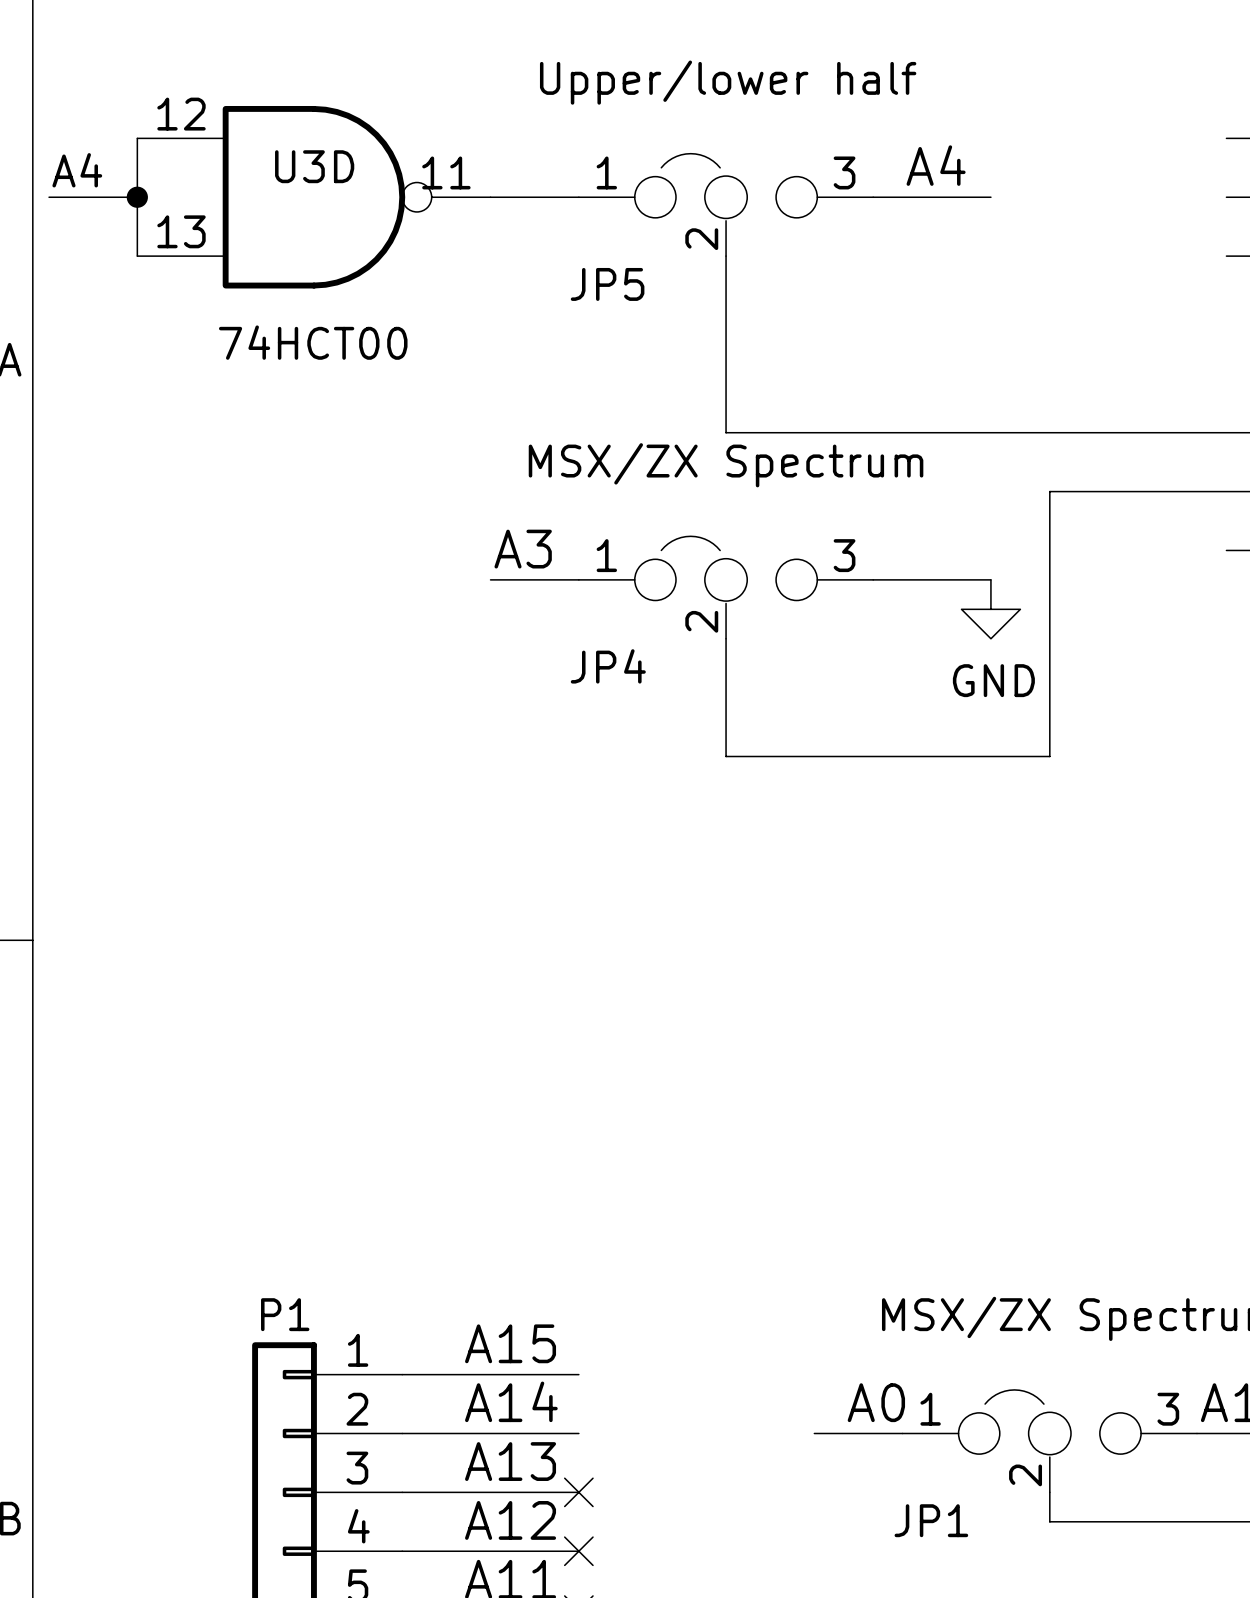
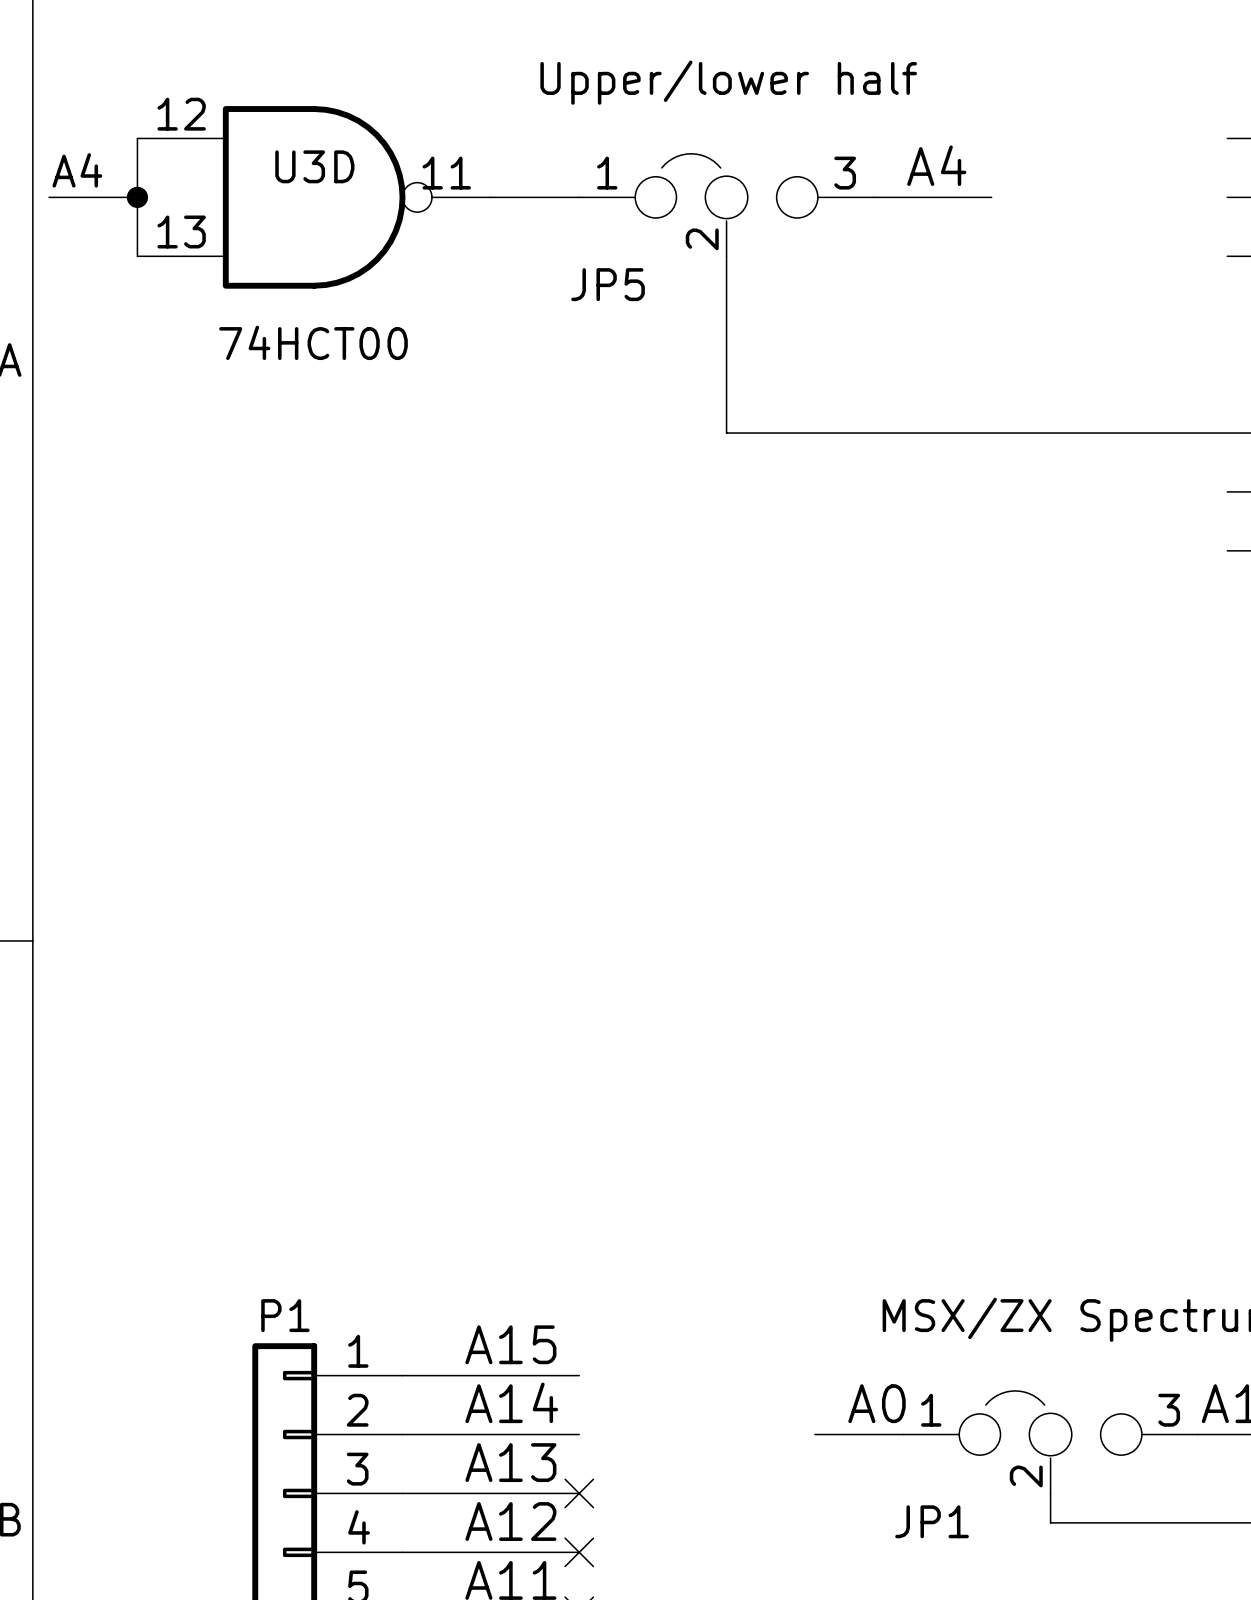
wire: (1226, 491) (1049, 491) (1049, 756) (726, 756) (726, 638) -> none
label: A3 (523, 549) -> none
wire: (490, 579) (578, 579) -> none
wire: (873, 579) (990, 579) -> none
JP4: MSX/ZX Spectrum (726, 587) -> none
power symbol: GND (990, 609) -> none

